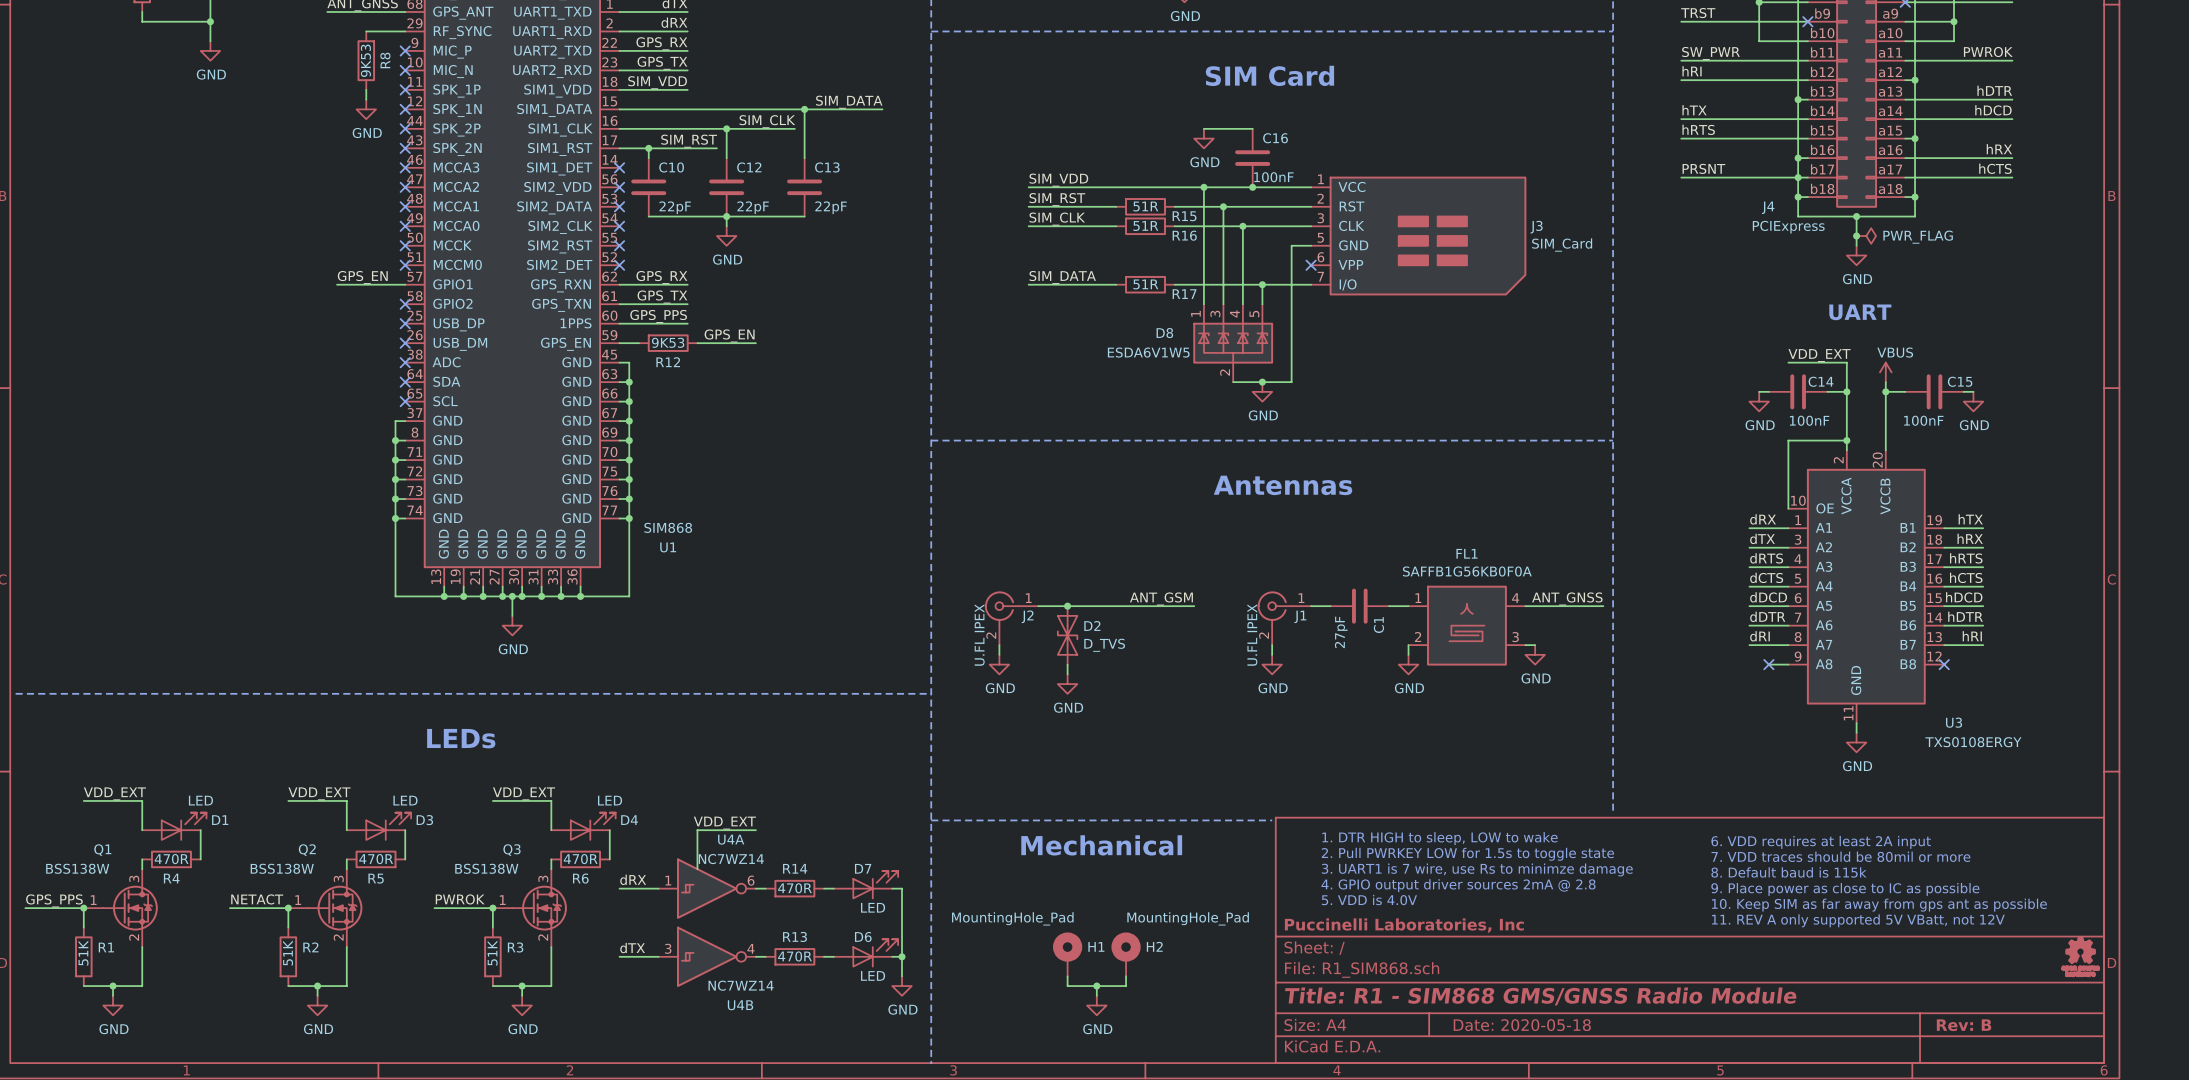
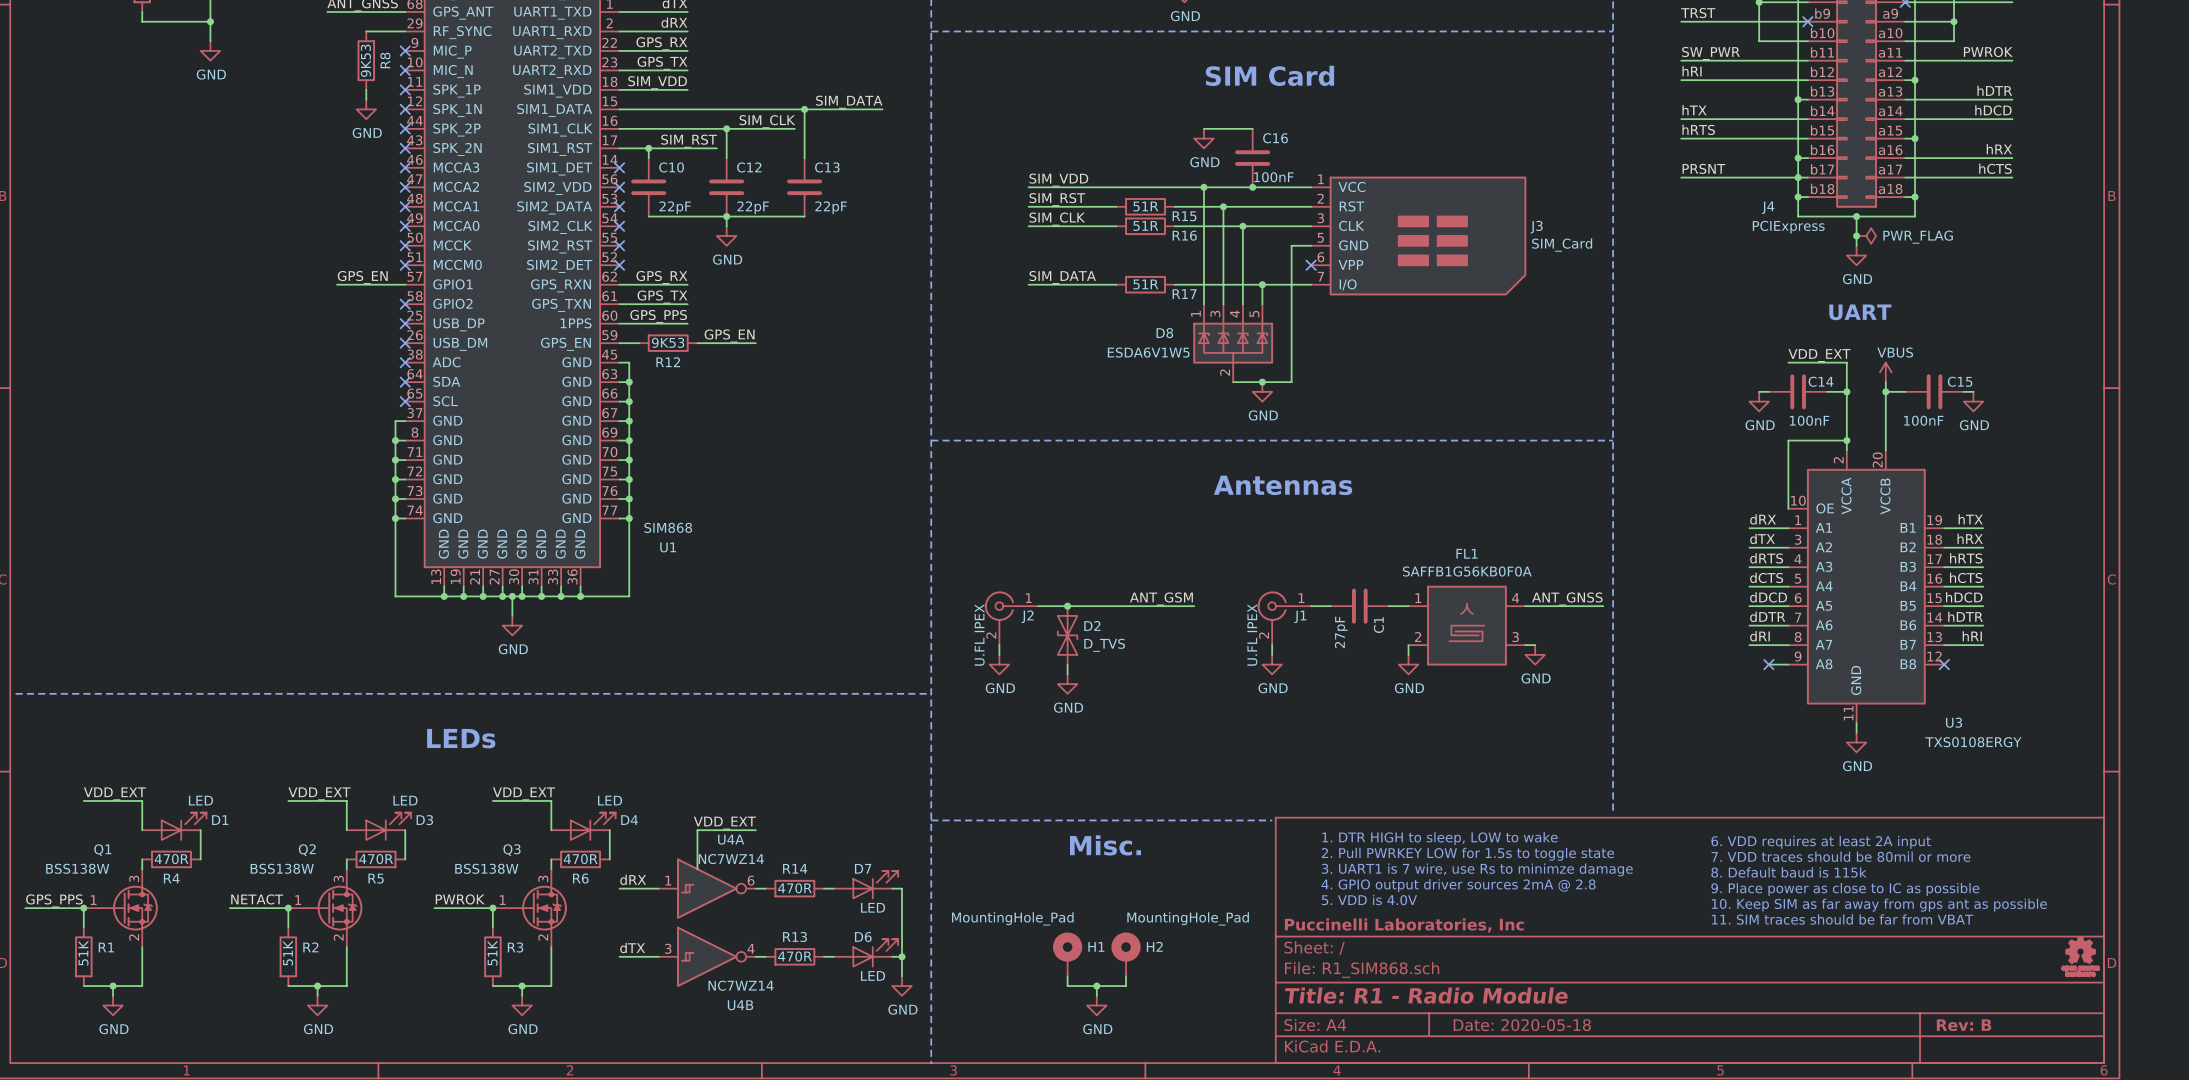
text: Mechanical (1101, 845) -> none
text: none -> Misc. (1105, 845)
text: 11. REV A only supported 5V VBatt, not 12V (1858, 920) -> 11. SIM traces should be far from VBAT (1842, 919)
title block: Title: R1 - SIM868 GMS/GNSS Radio Module (1540, 996) -> Title: R1 - Radio Module (1426, 995)

